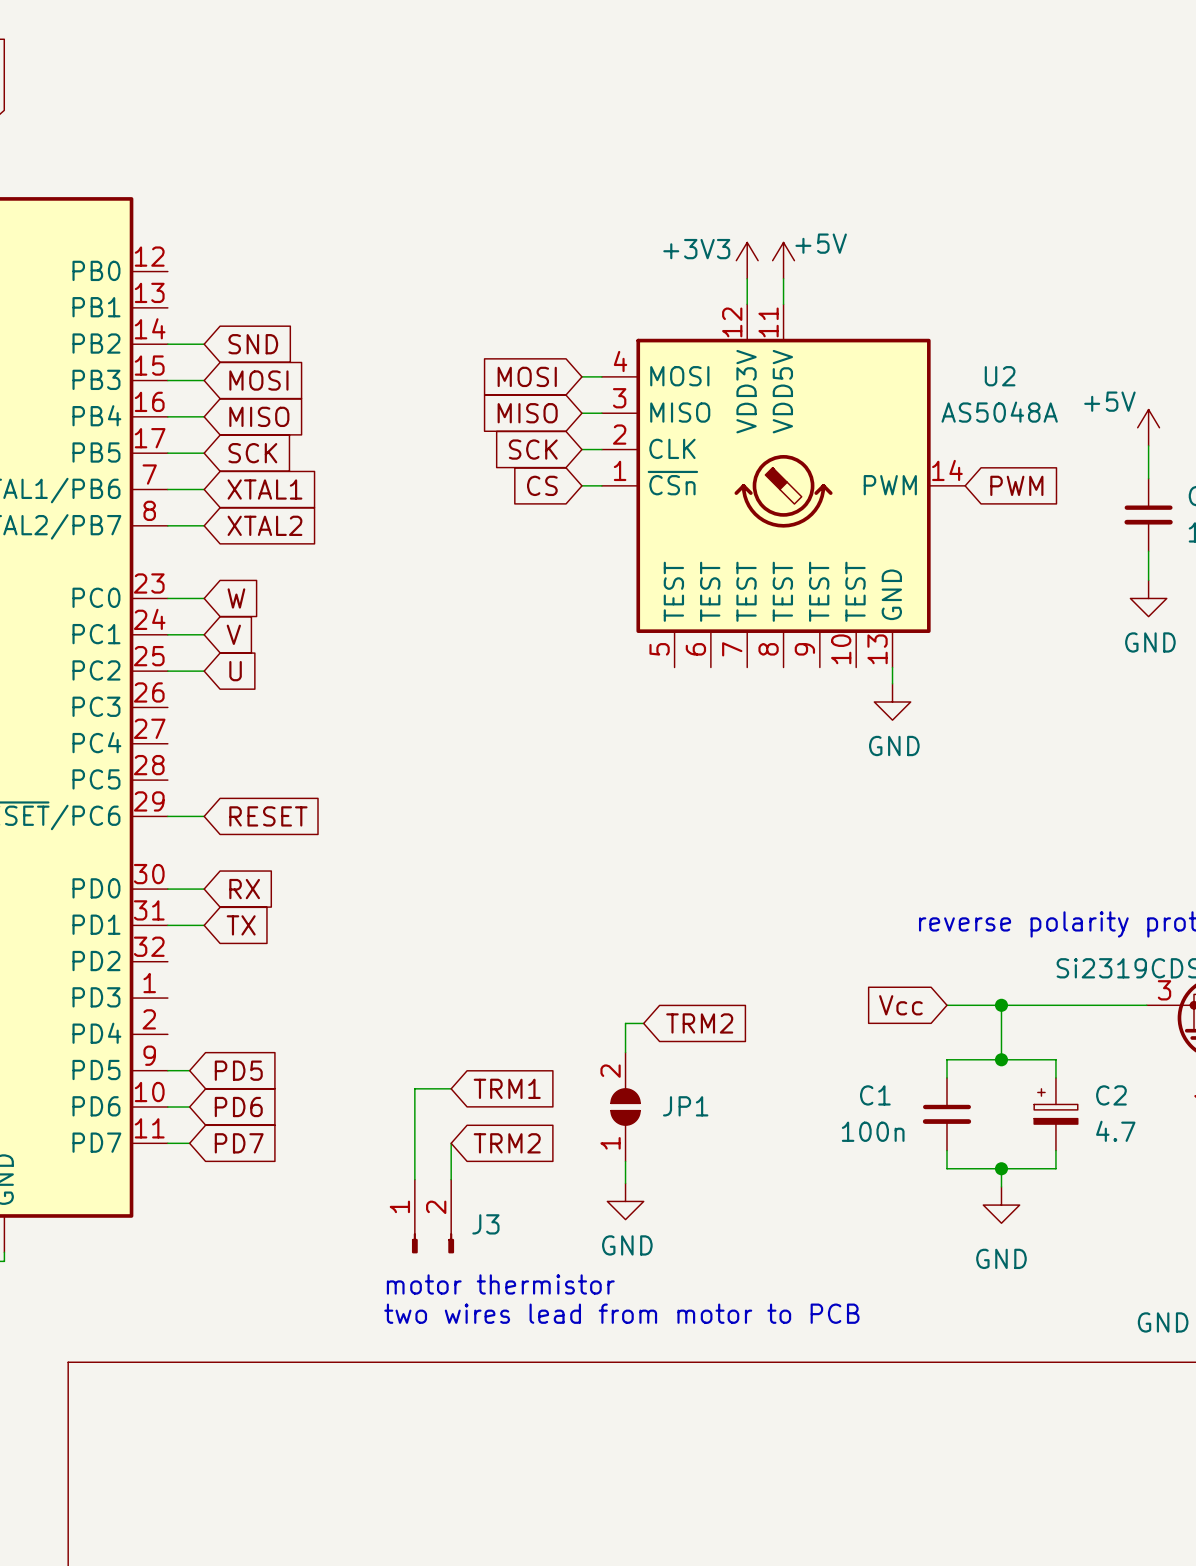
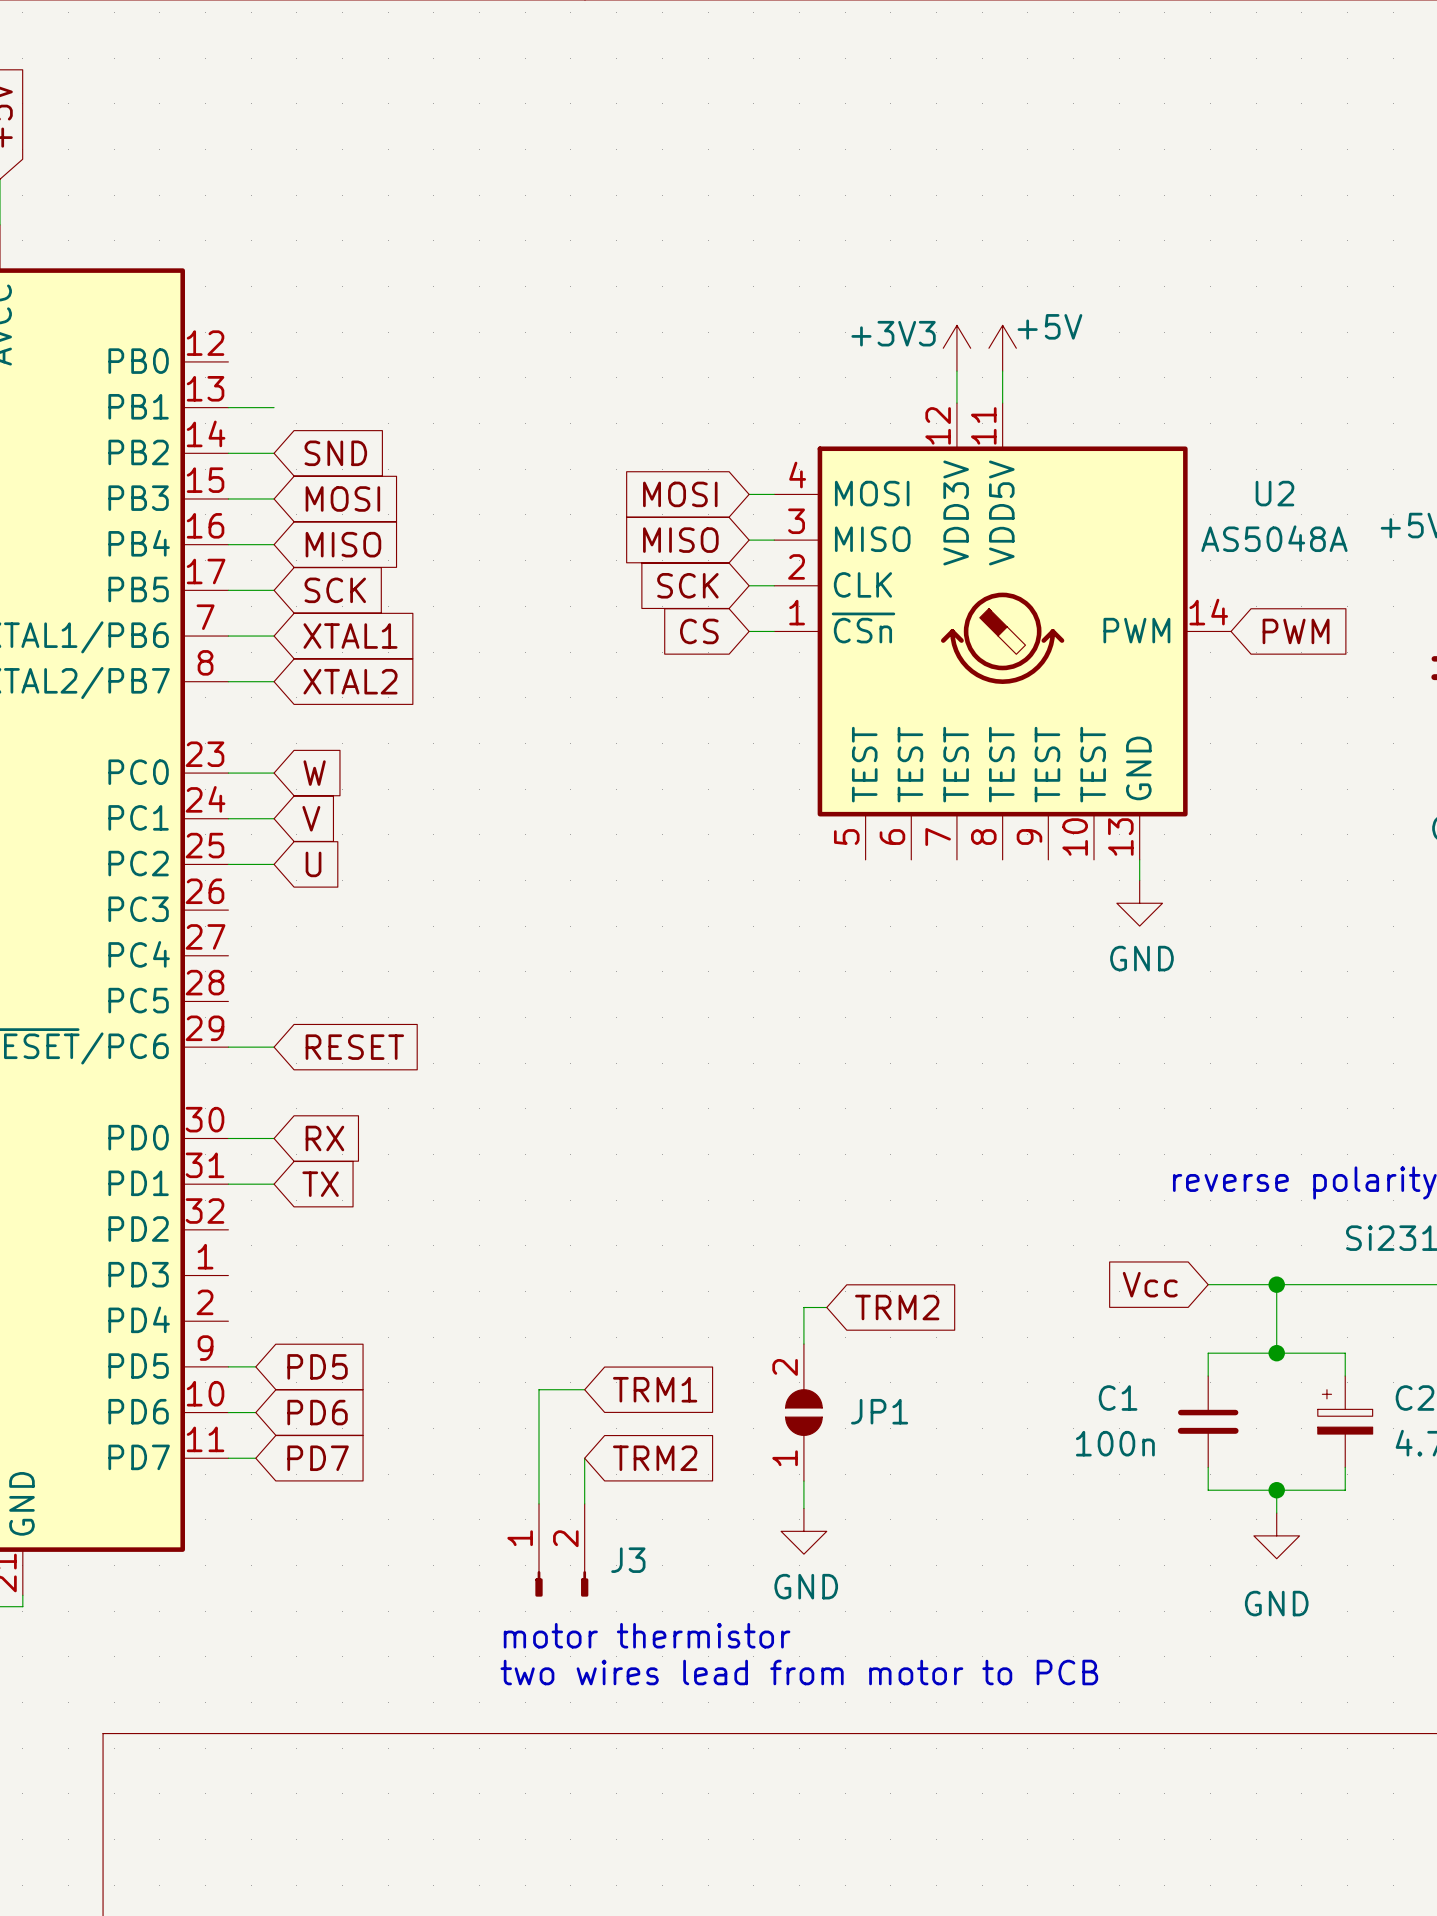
wire: none -> (228, 407) (274, 407)

